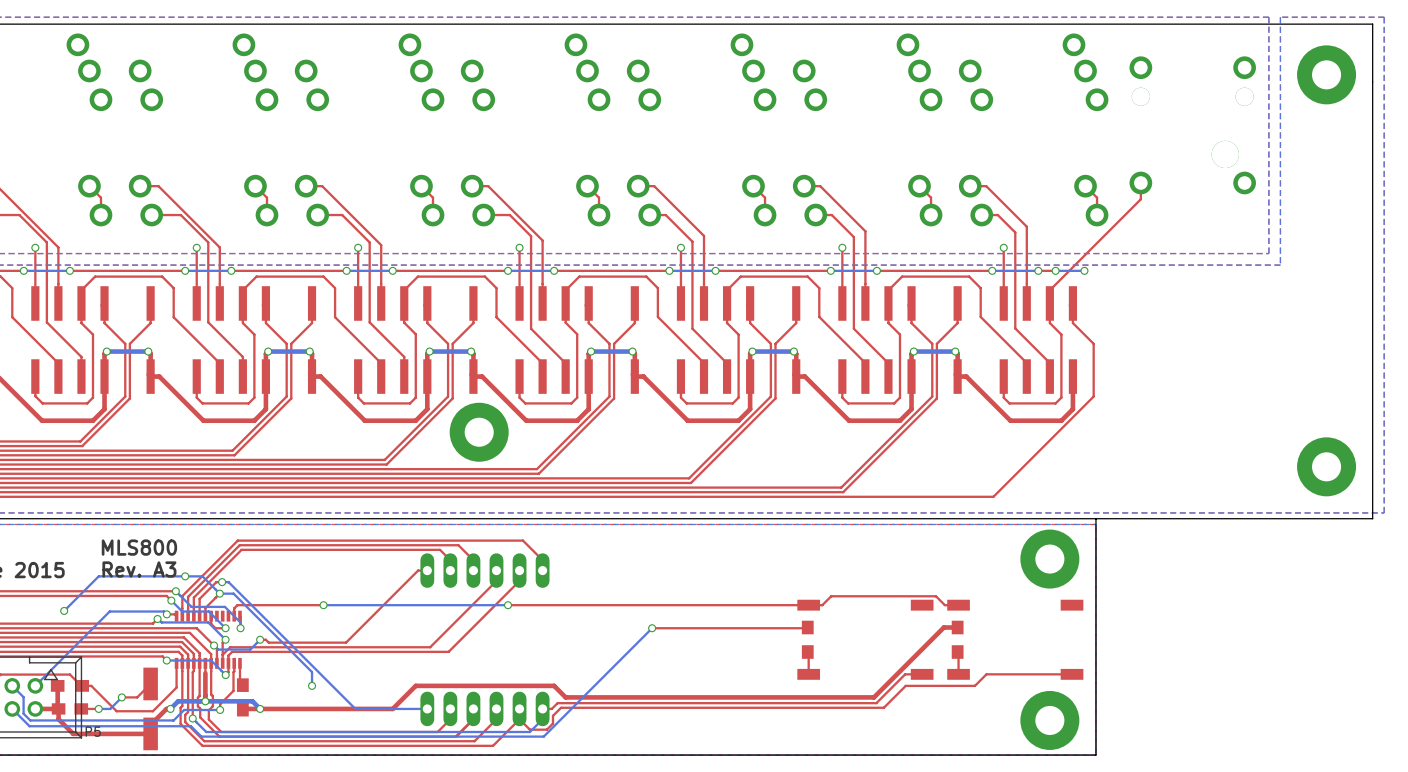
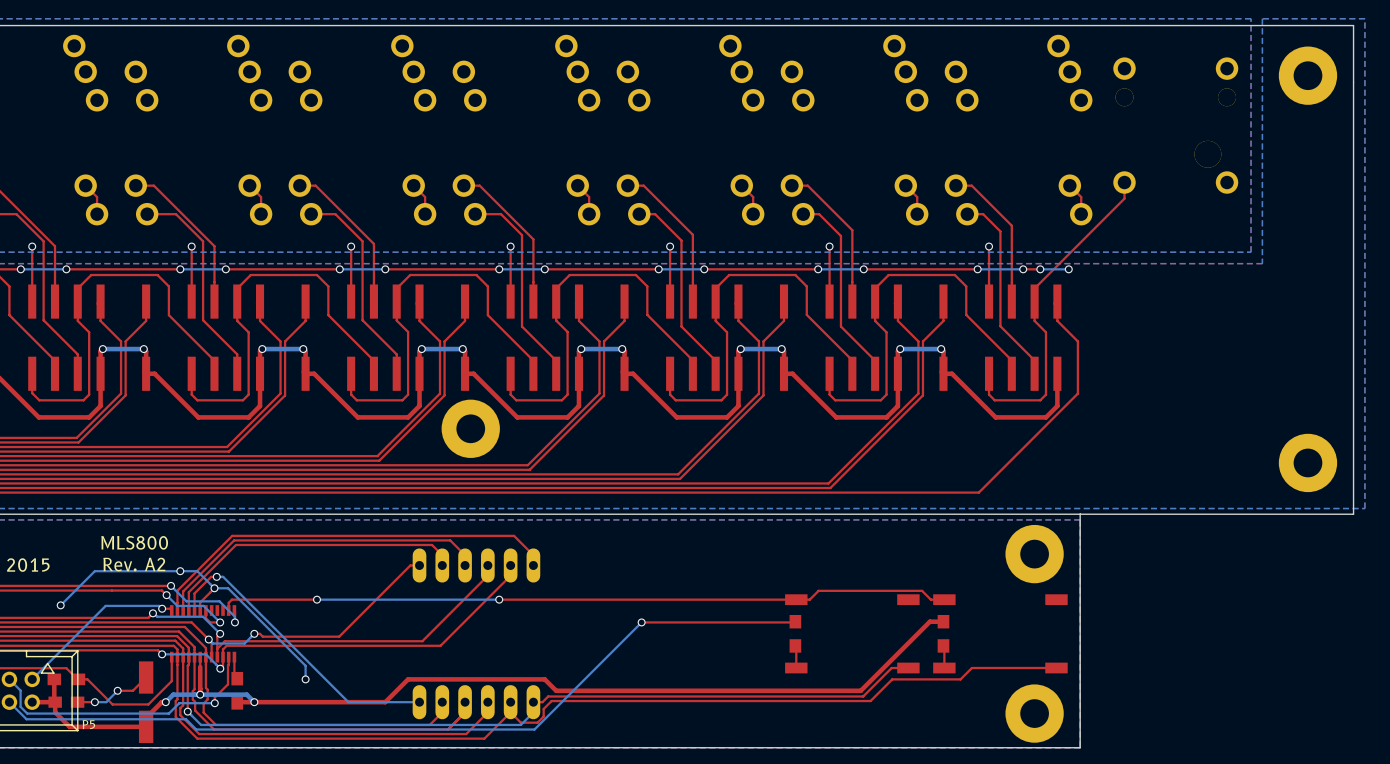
text: Rev. A3 (139, 569) -> Rev. A2 (134, 564)

